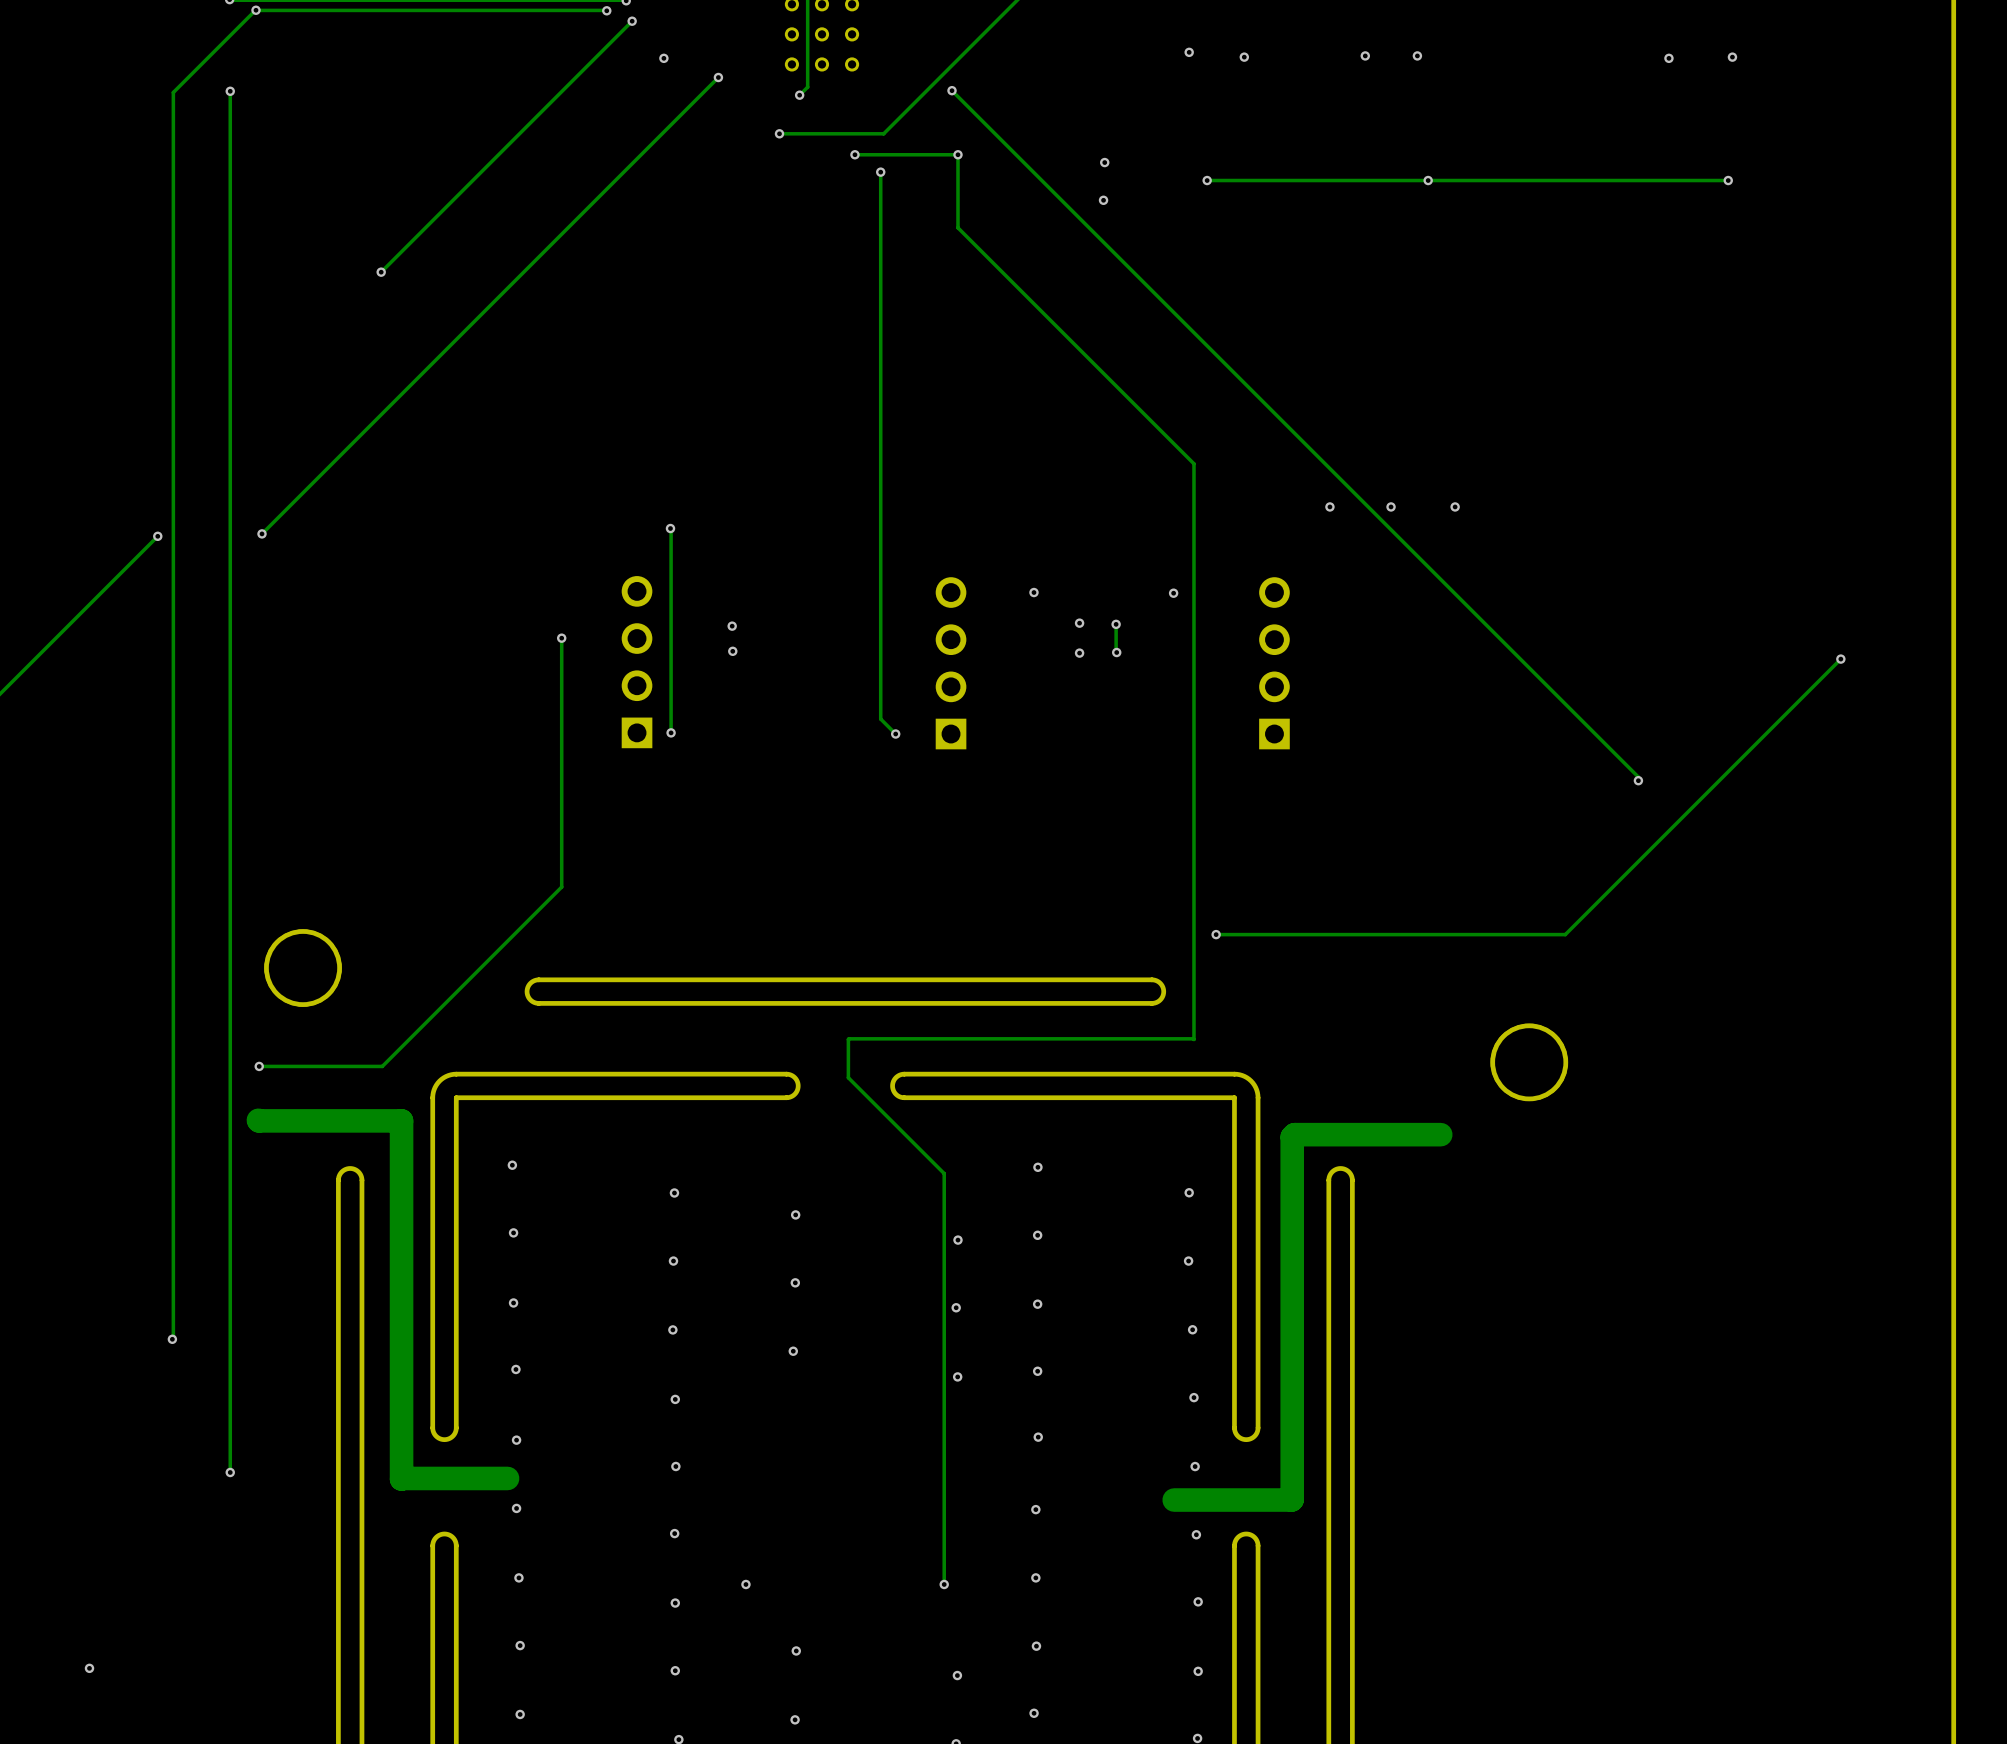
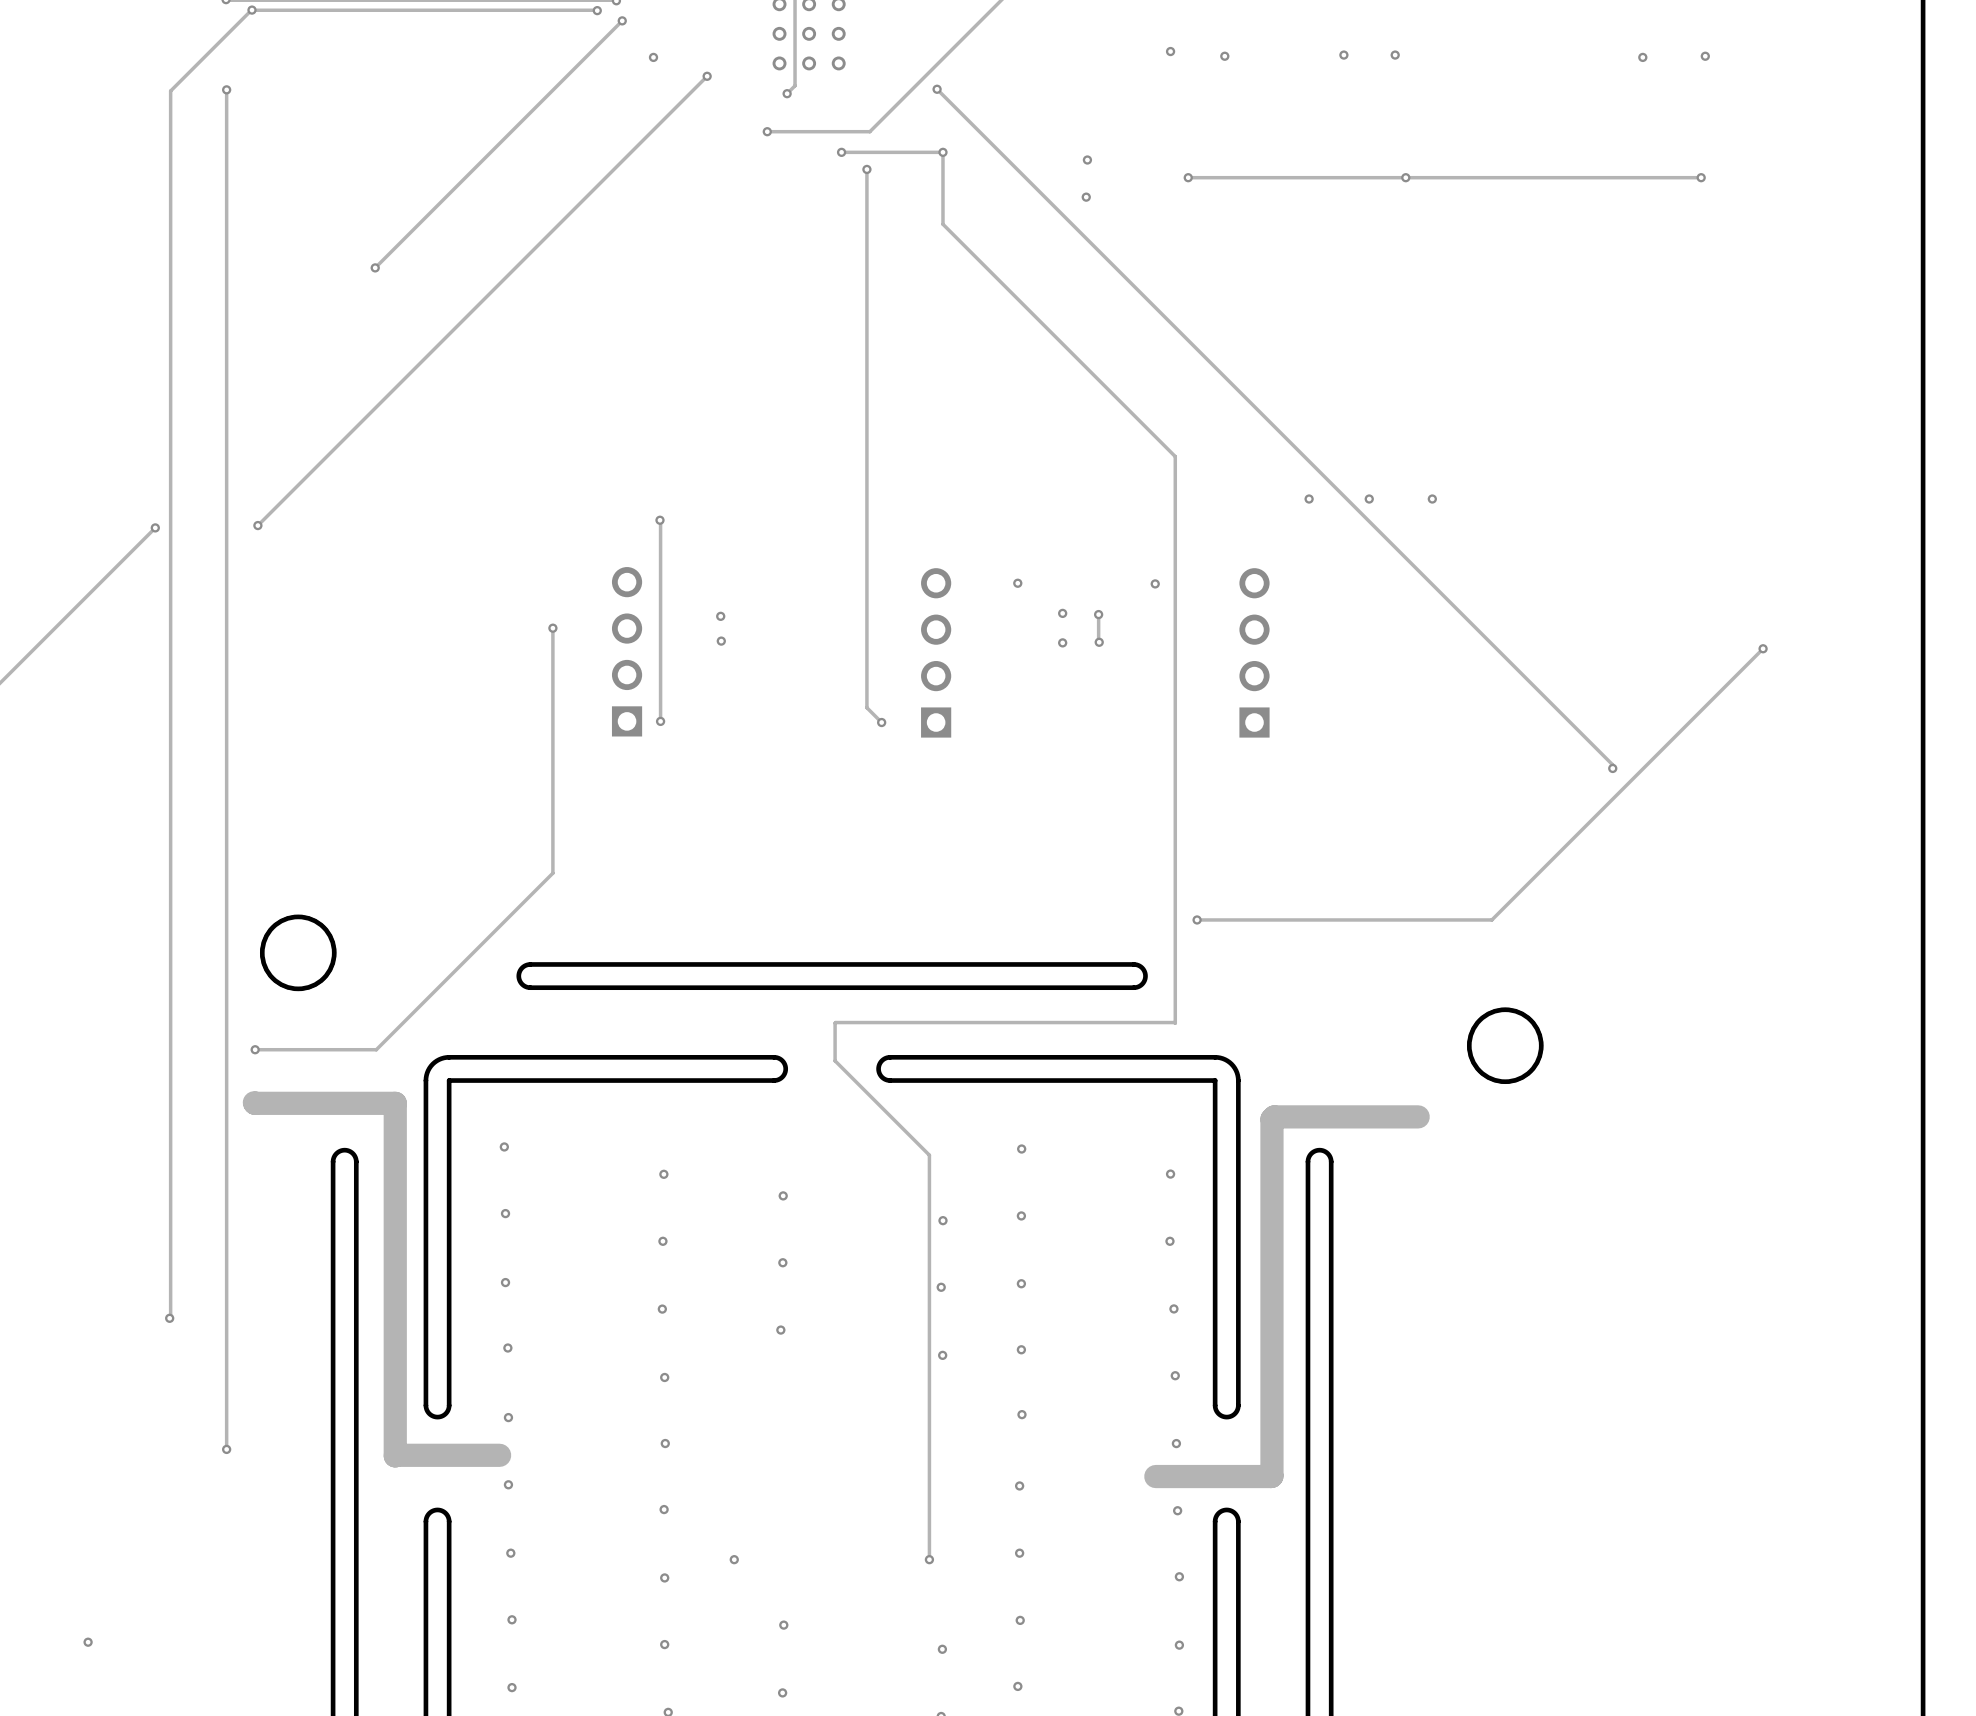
track: (1840, 659) (1565, 934) (1515, 934) -> (1763, 648) (1491, 919)
via position: (1840, 659) -> (1763, 648)

